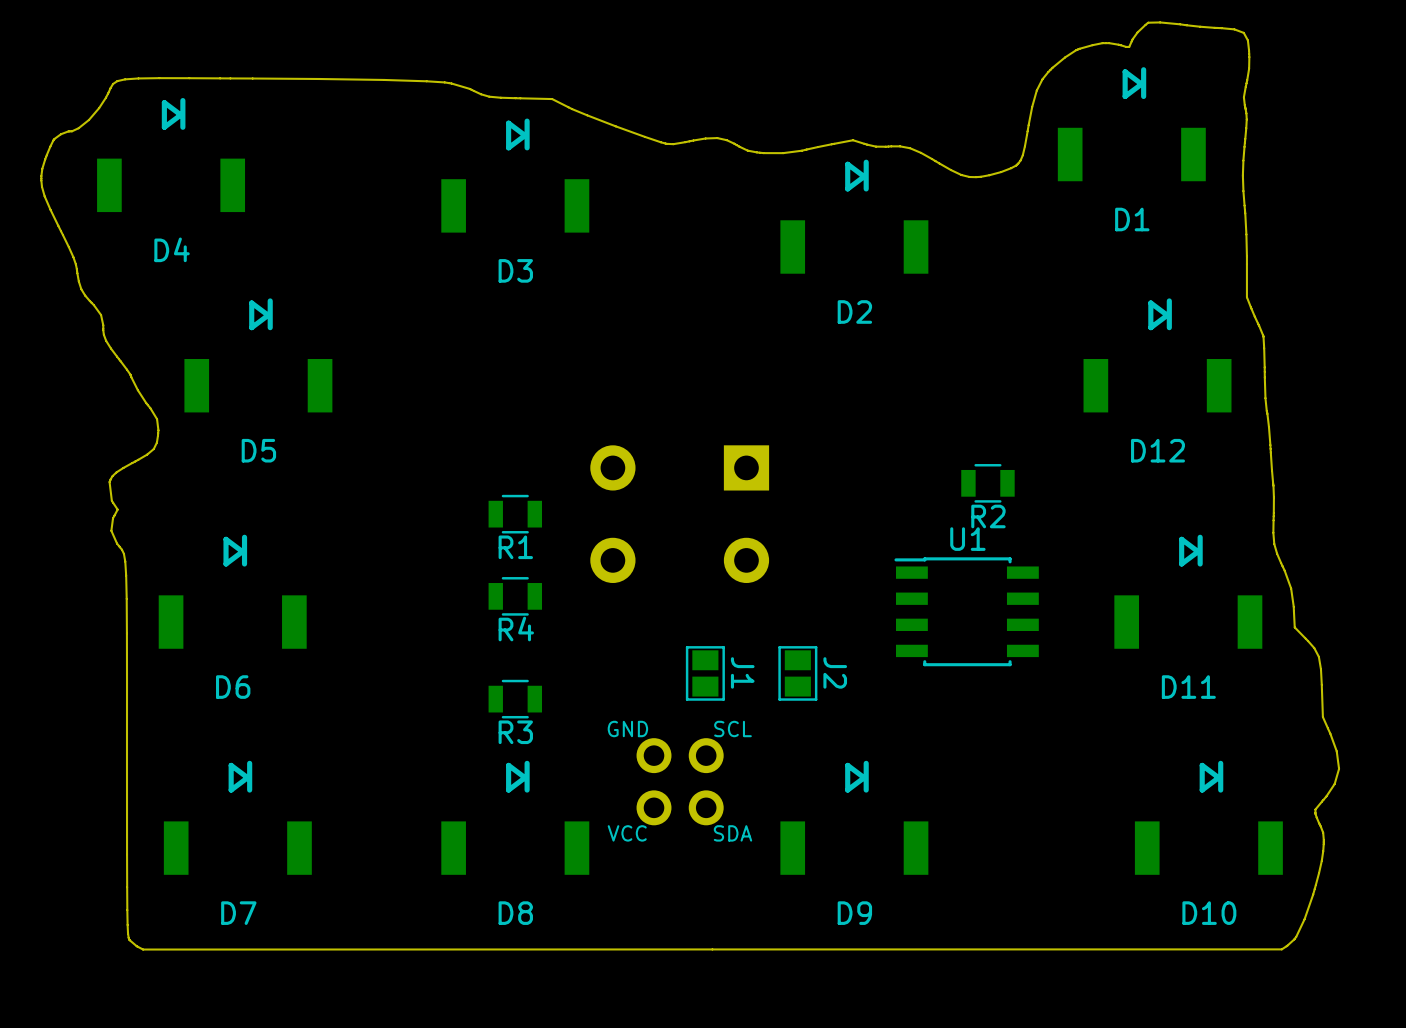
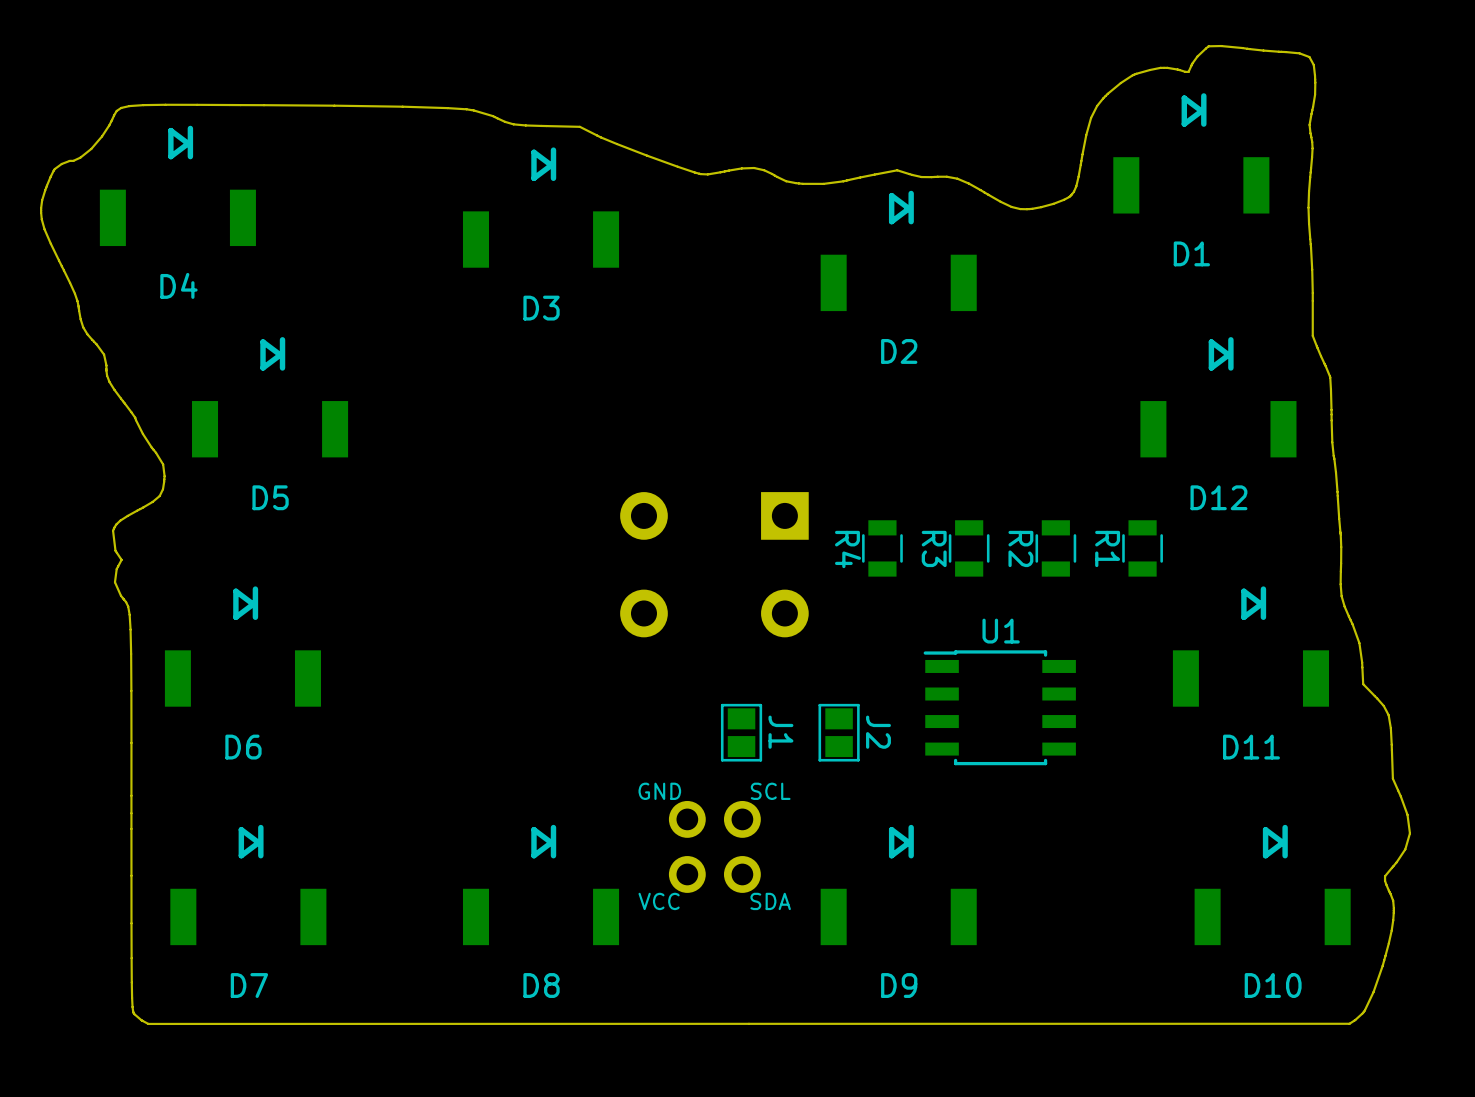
R2 rotation: 0° (987, 483) -> 90° clockwise (1055, 548)
R1 rotation: 0° (515, 514) -> 90° clockwise (1142, 548)
R1 position: (515, 514) -> (1142, 548)
R4 rotation: 0° (515, 596) -> 90° clockwise (882, 548)
R4 position: (515, 596) -> (882, 548)
U1 position: (966, 611) -> (999, 707)
R3 rotation: 0° (515, 699) -> 90° clockwise (969, 548)
R3 position: (515, 699) -> (969, 548)

